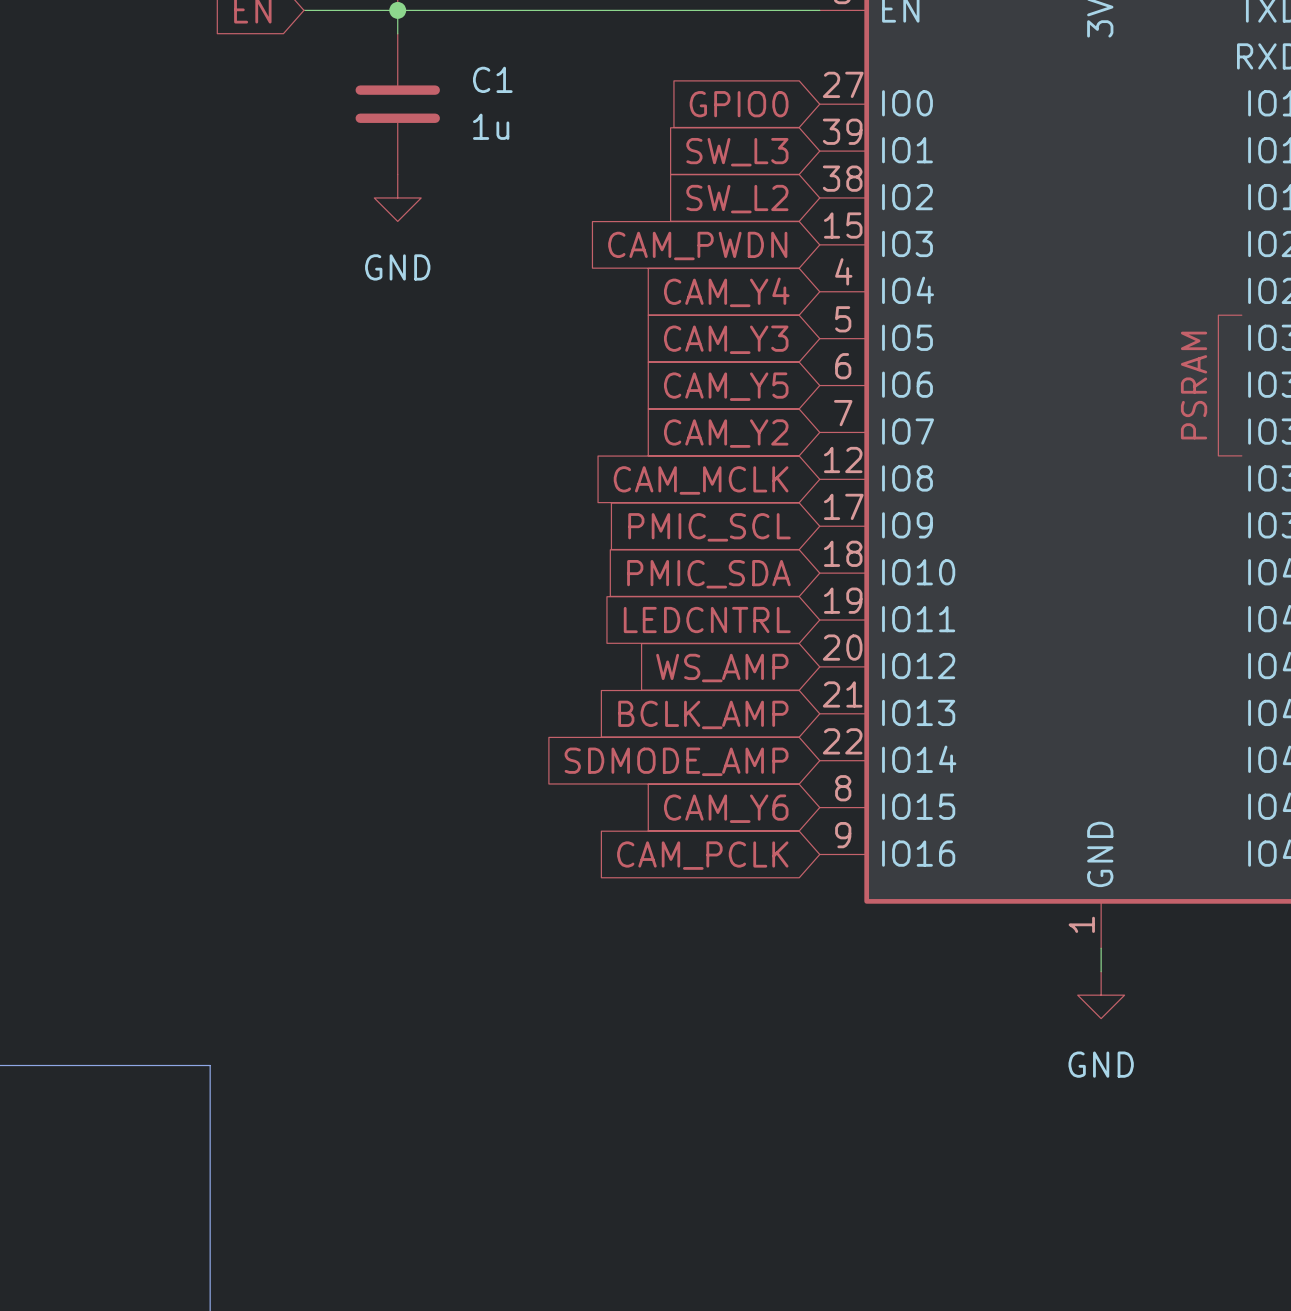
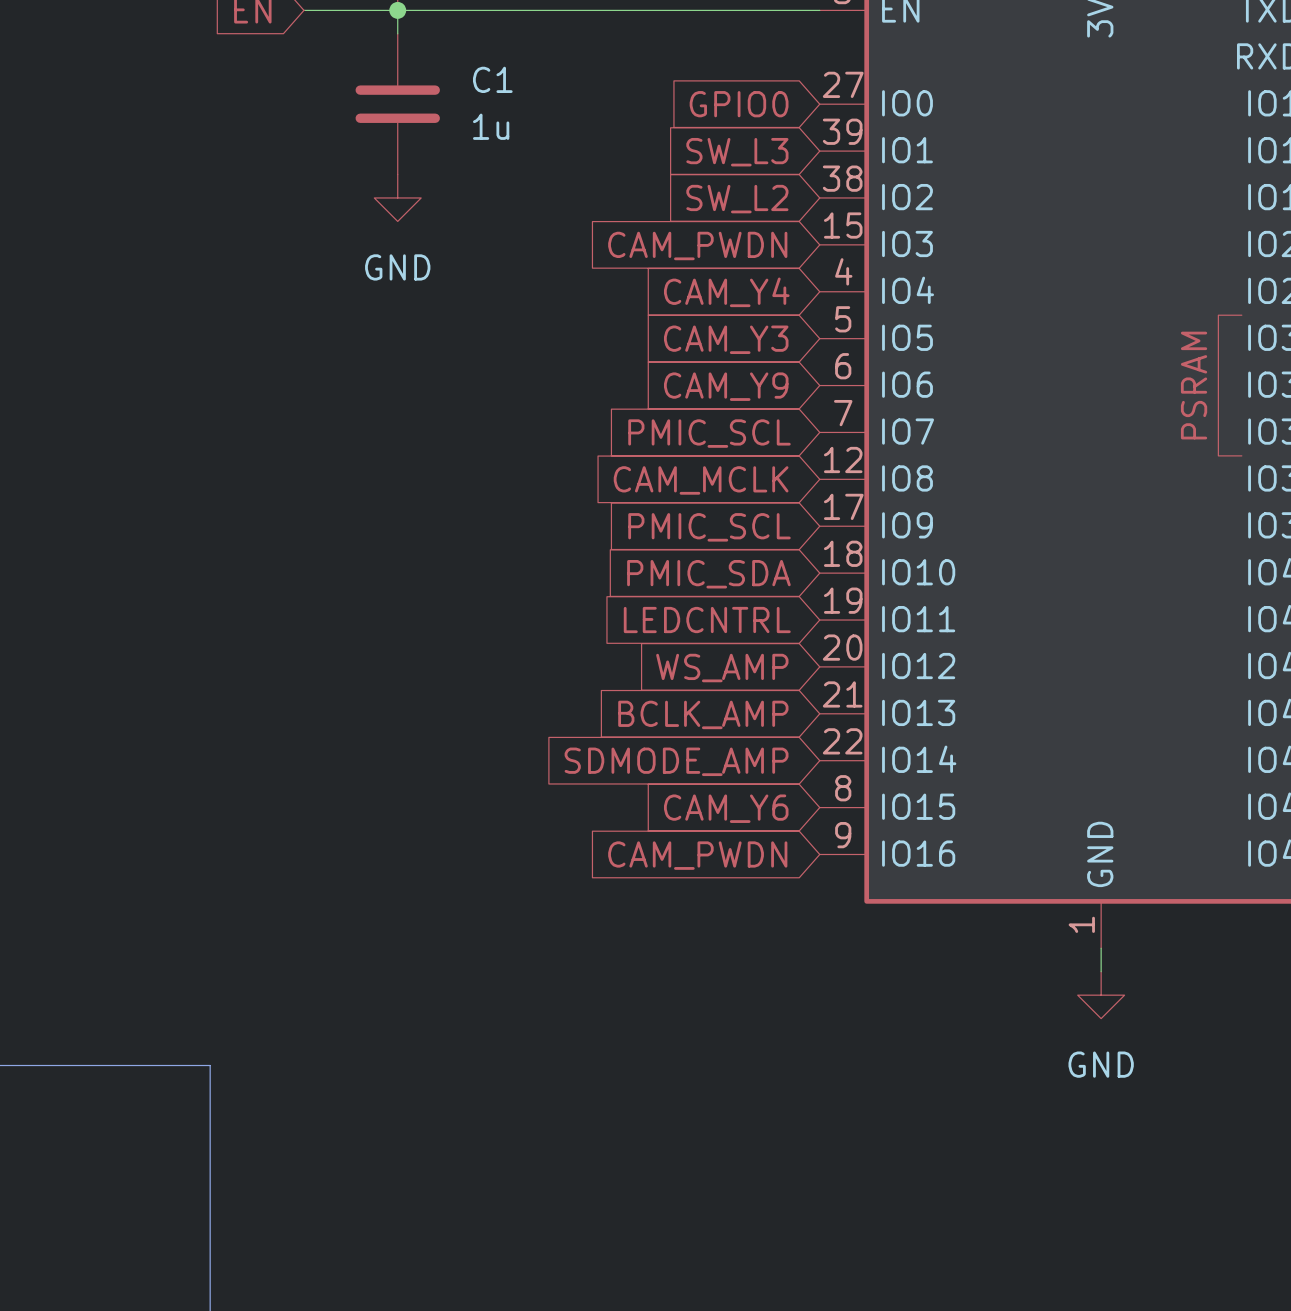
global label: CAM_Y5 (726, 386) -> CAM_Y9 (726, 386)
global label: CAM_Y2 (726, 433) -> PMIC_SCL (709, 433)
global label: CAM_PCLK (702, 855) -> CAM_PWDN (697, 855)

